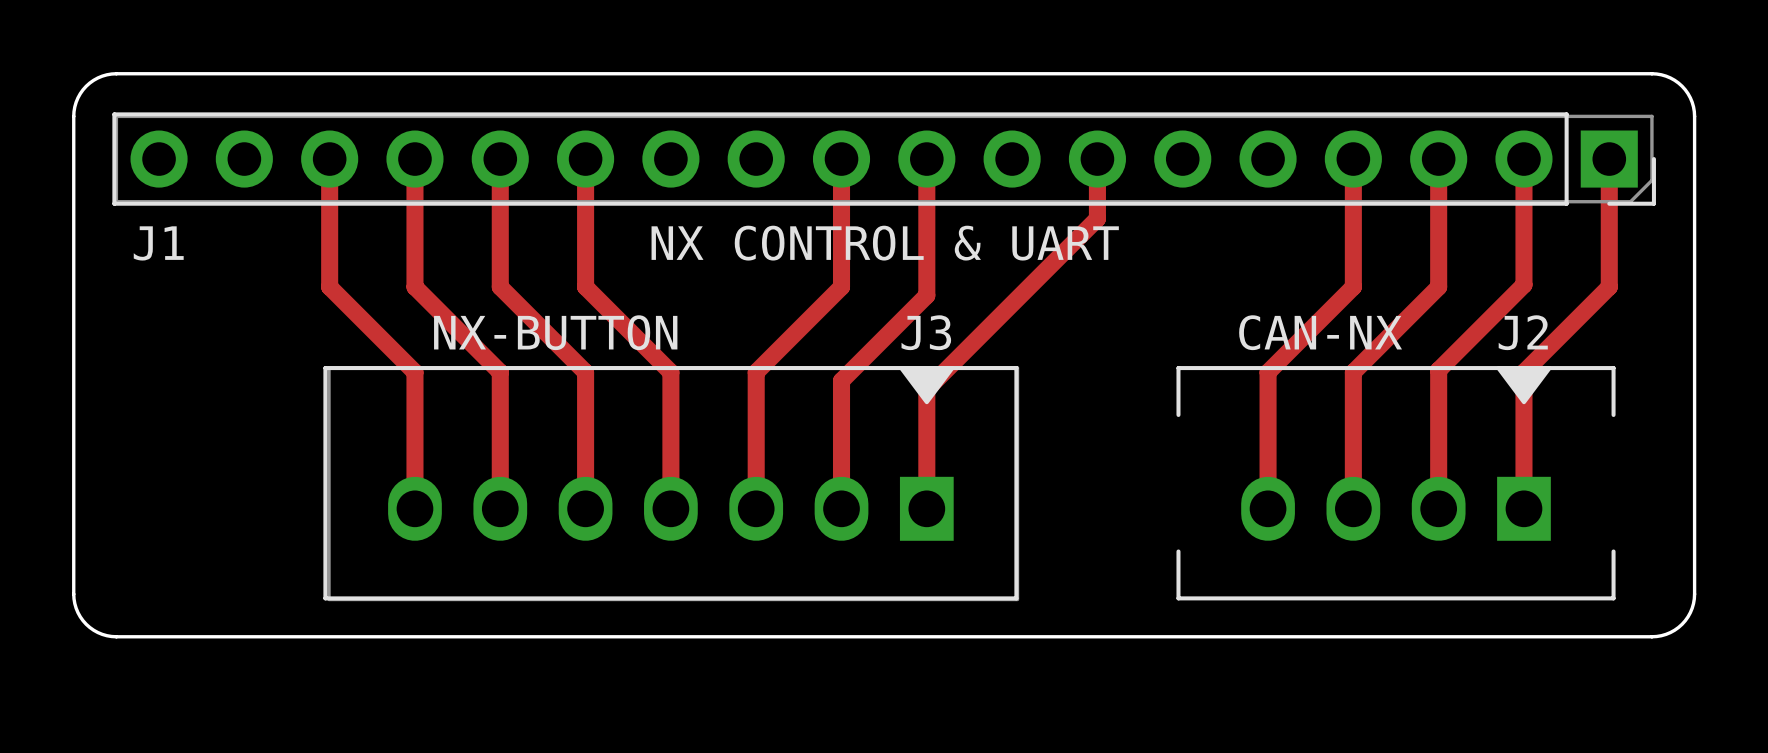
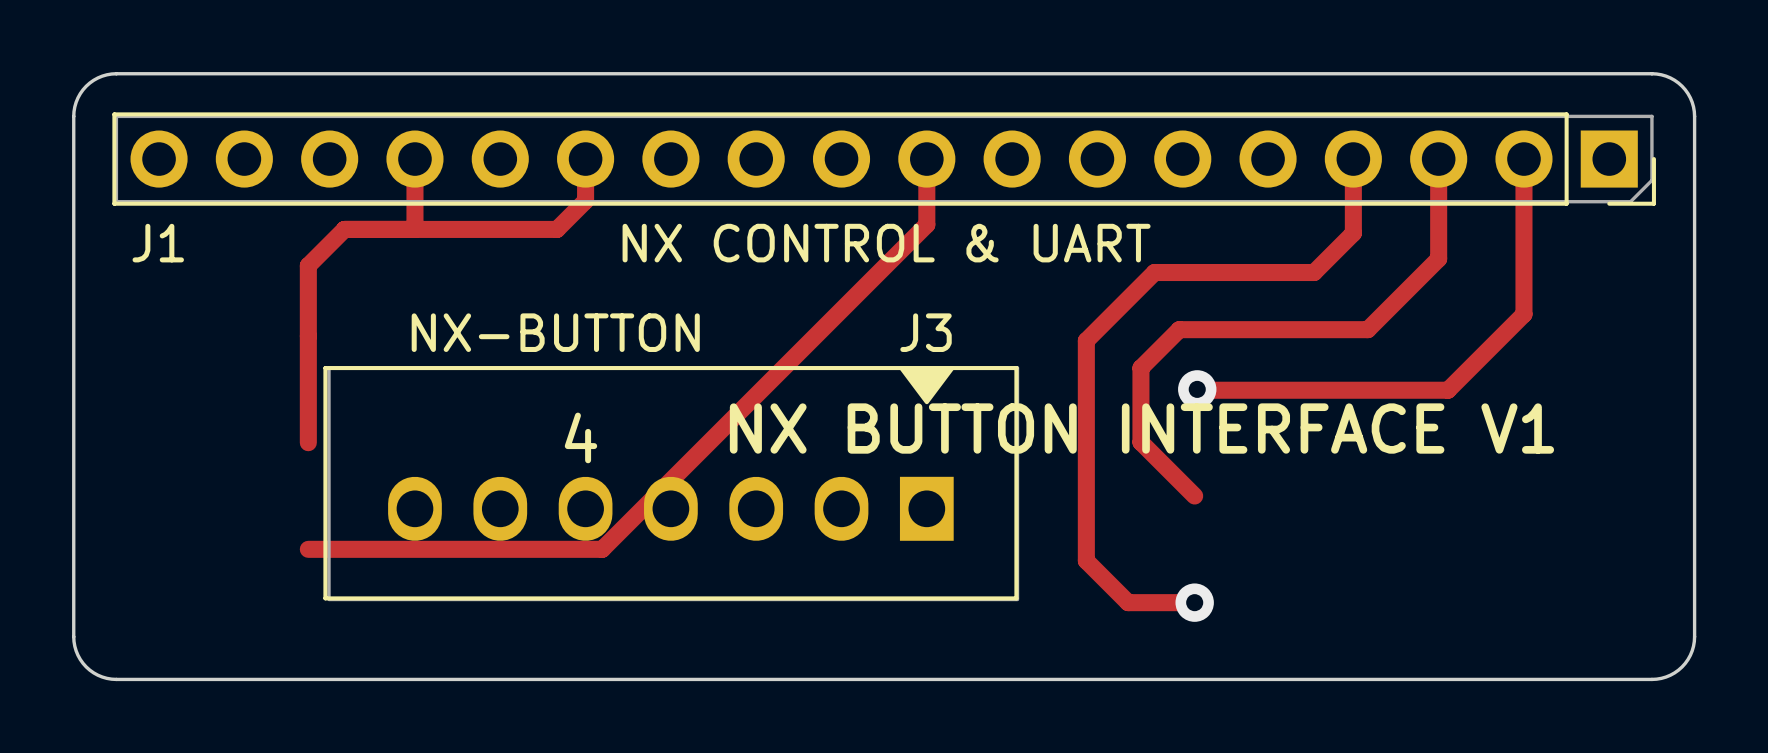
track: (329, 159) (329, 287) (414, 372) (414, 508) -> none
track: (500, 159) (500, 287) (585, 372) (585, 508) -> none
track: (841, 159) (841, 287) (756, 372) (756, 508) -> none
track: (1097, 159) (1097, 218) (926, 389) (926, 508) -> none
track: (1609, 159) (1609, 287) (1523, 372) (1523, 508) -> none
track: (585, 200) (585, 287) (670, 372) (670, 508) -> (585, 200) (557, 229) (344, 229) (308, 265) (308, 442)
track: (926, 224) (926, 295) (841, 380) (841, 508) -> (926, 224) (602, 549) (308, 549)
track: (414, 229) (414, 287) (500, 372) (500, 508) -> none
track: (1353, 233) (1353, 287) (1268, 372) (1268, 508) -> (1353, 233) (1314, 272) (1154, 272) (1086, 340) (1086, 560) (1128, 602) (1194, 602)
track: (1438, 258) (1438, 287) (1353, 372) (1353, 508) -> (1438, 258) (1367, 329) (1179, 329) (1140, 368) (1140, 442) (1194, 496)
track: (1523, 284) (1438, 370) (1438, 508) -> (1523, 284) (1523, 314) (1448, 390) (1197, 389)
via: none -> (1197, 389)
text: none -> NX BUTTON INTERFACE V1 (1141, 428)
text: none -> 4 (580, 437)
J2: CAN-NX (1396, 483) -> none
board edge: (73, 594) (77, 612) (86, 624) (102, 634) (116, 636) (1651, 636) (1666, 634) (1682, 624) (1690, 612) (1694, 594) -> (73, 594) (74, 641) (77, 655) (83, 663) (93, 672) (102, 677) (116, 679) (1651, 679) (1661, 678) (1674, 672) (1682, 666) (1690, 655) (1694, 641) (1694, 594)
via: none -> (1194, 602)

